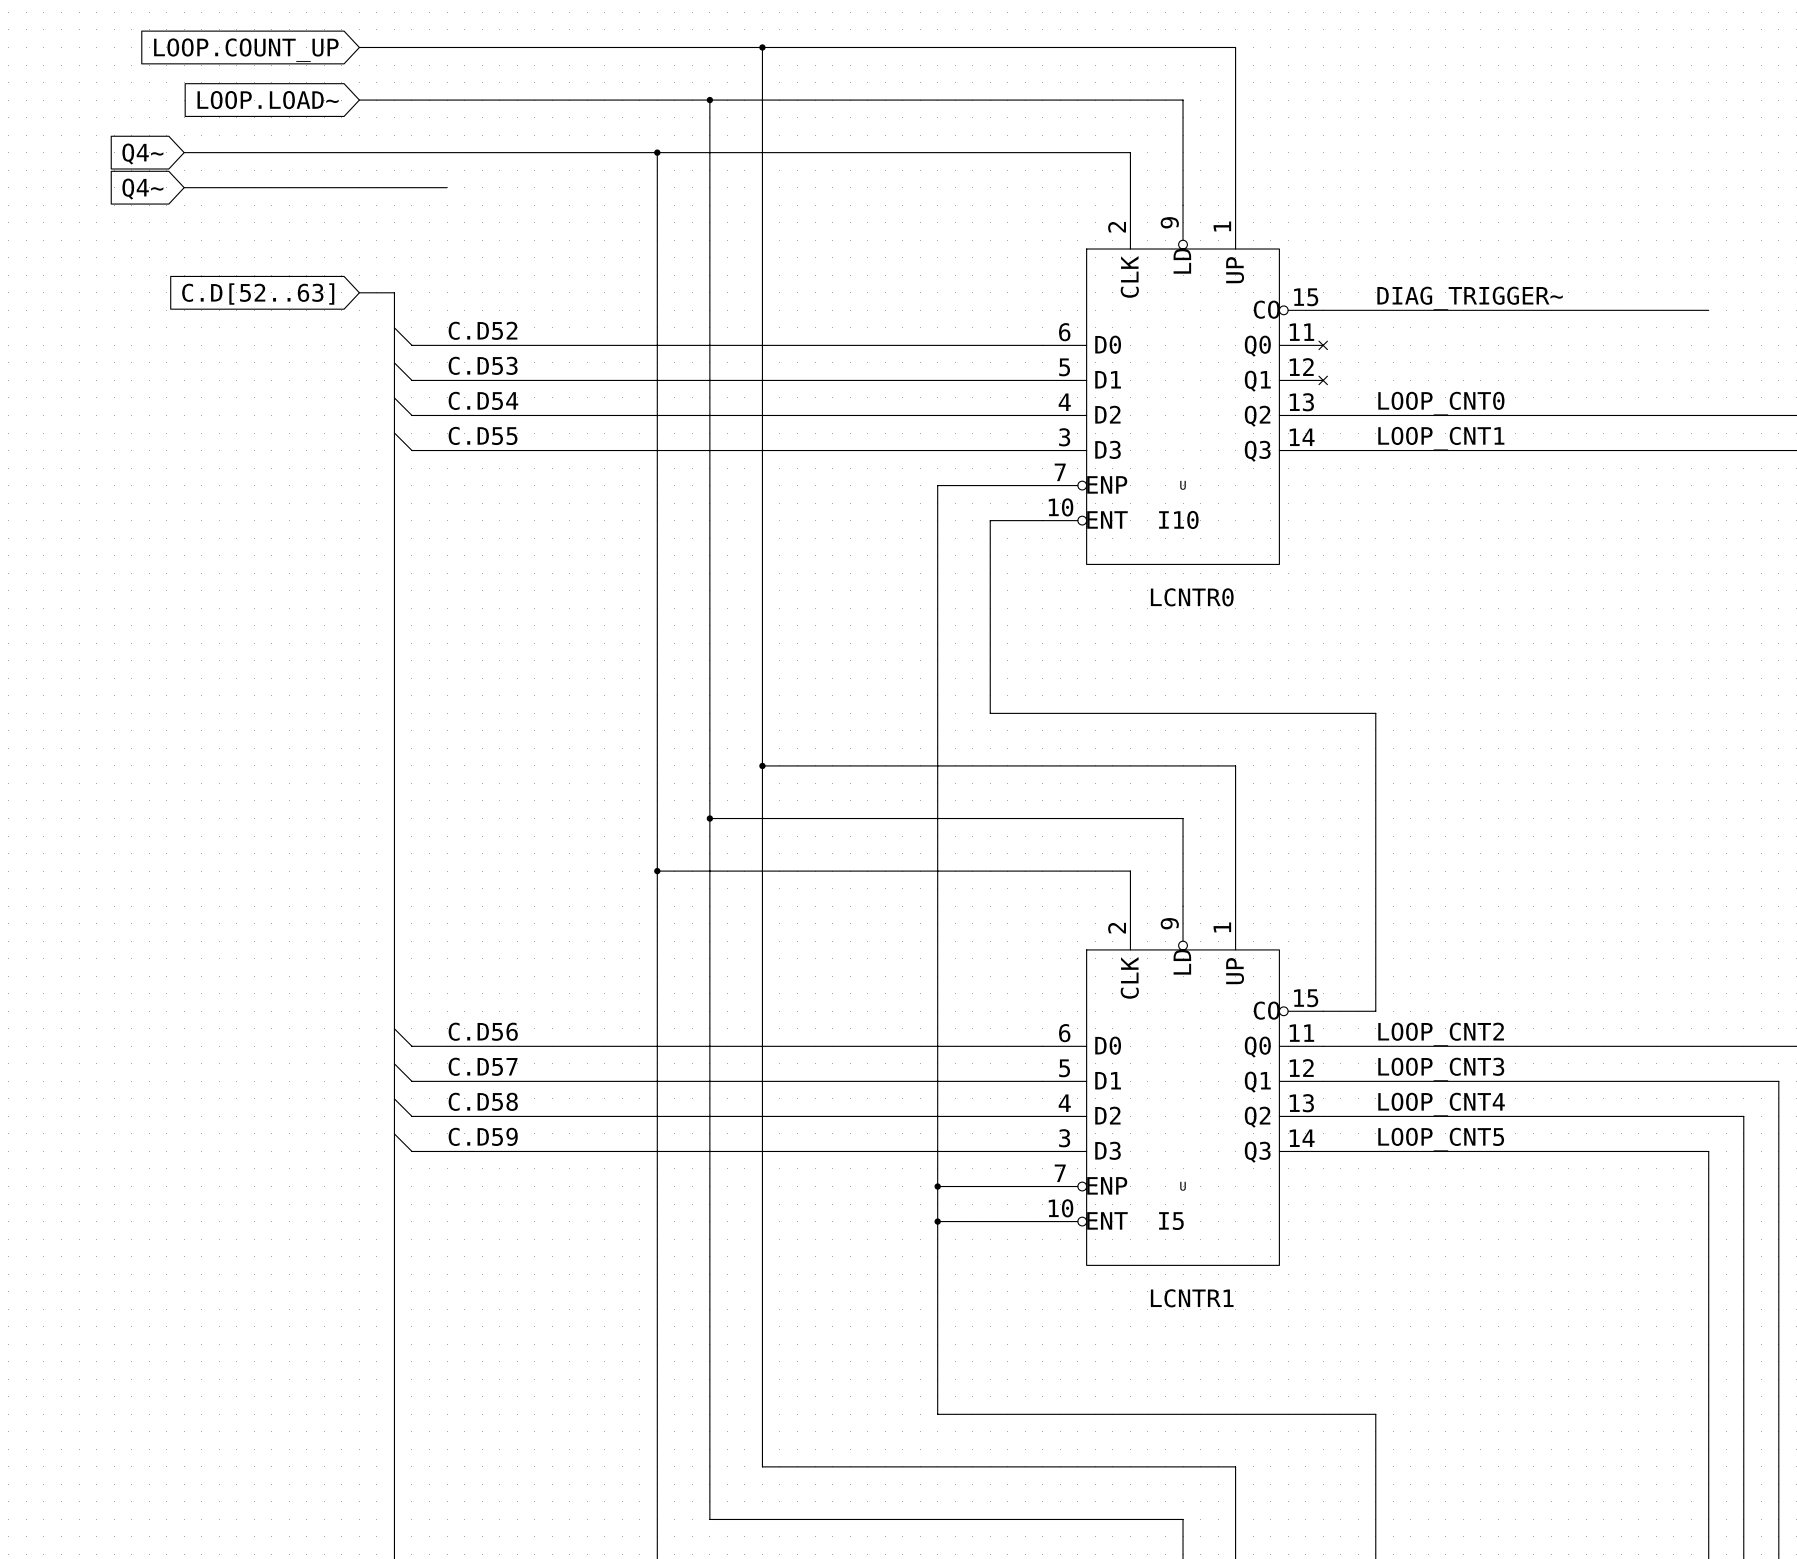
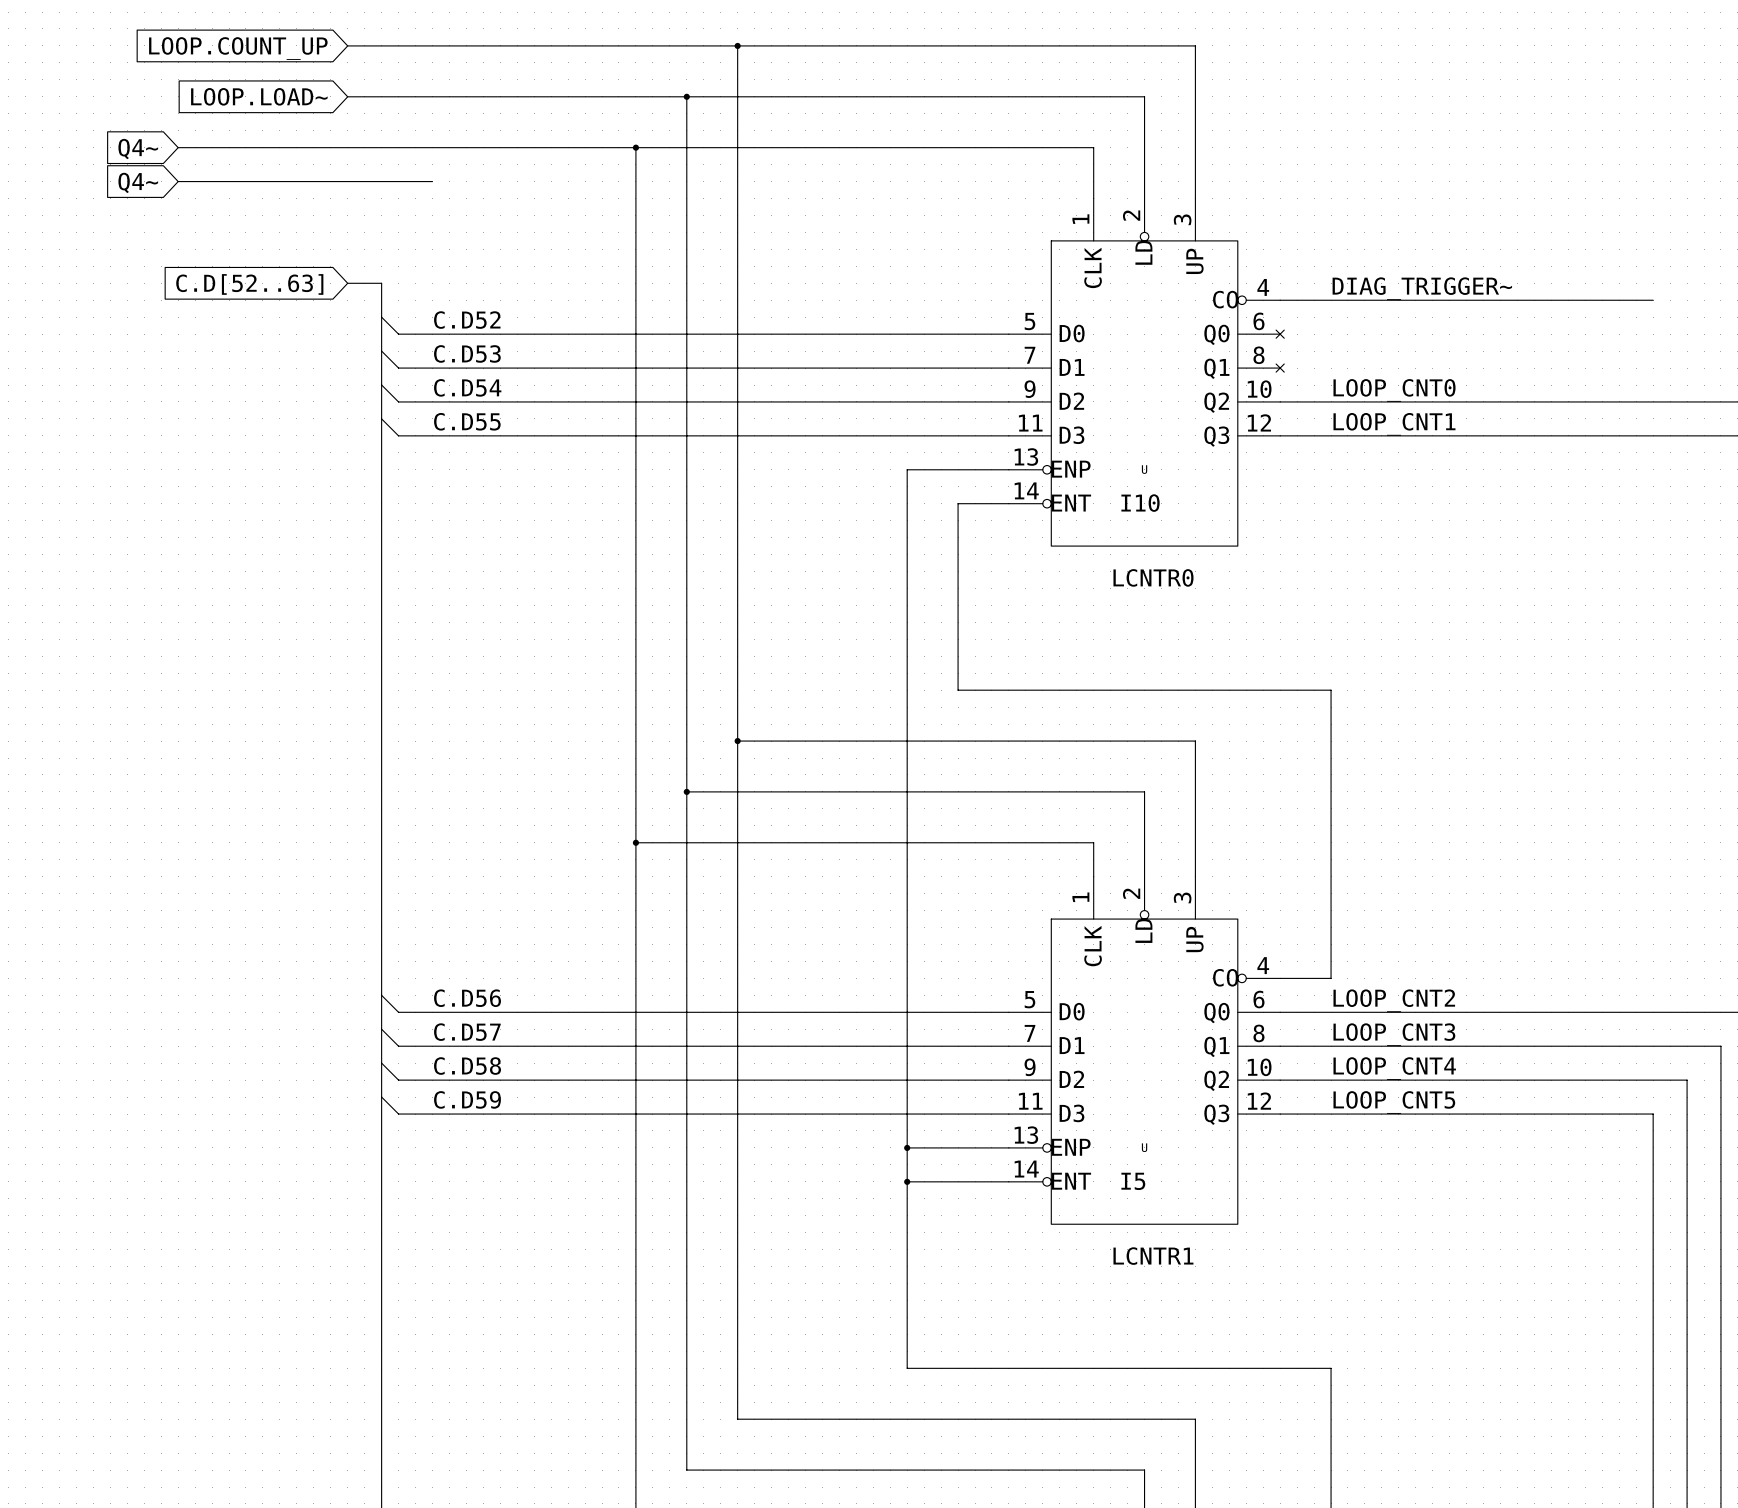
U symbol: [1042, 205, 1324, 565] -> [1008, 198, 1281, 547]
U symbol: [1042, 906, 1324, 1266] -> [1008, 876, 1281, 1225]

